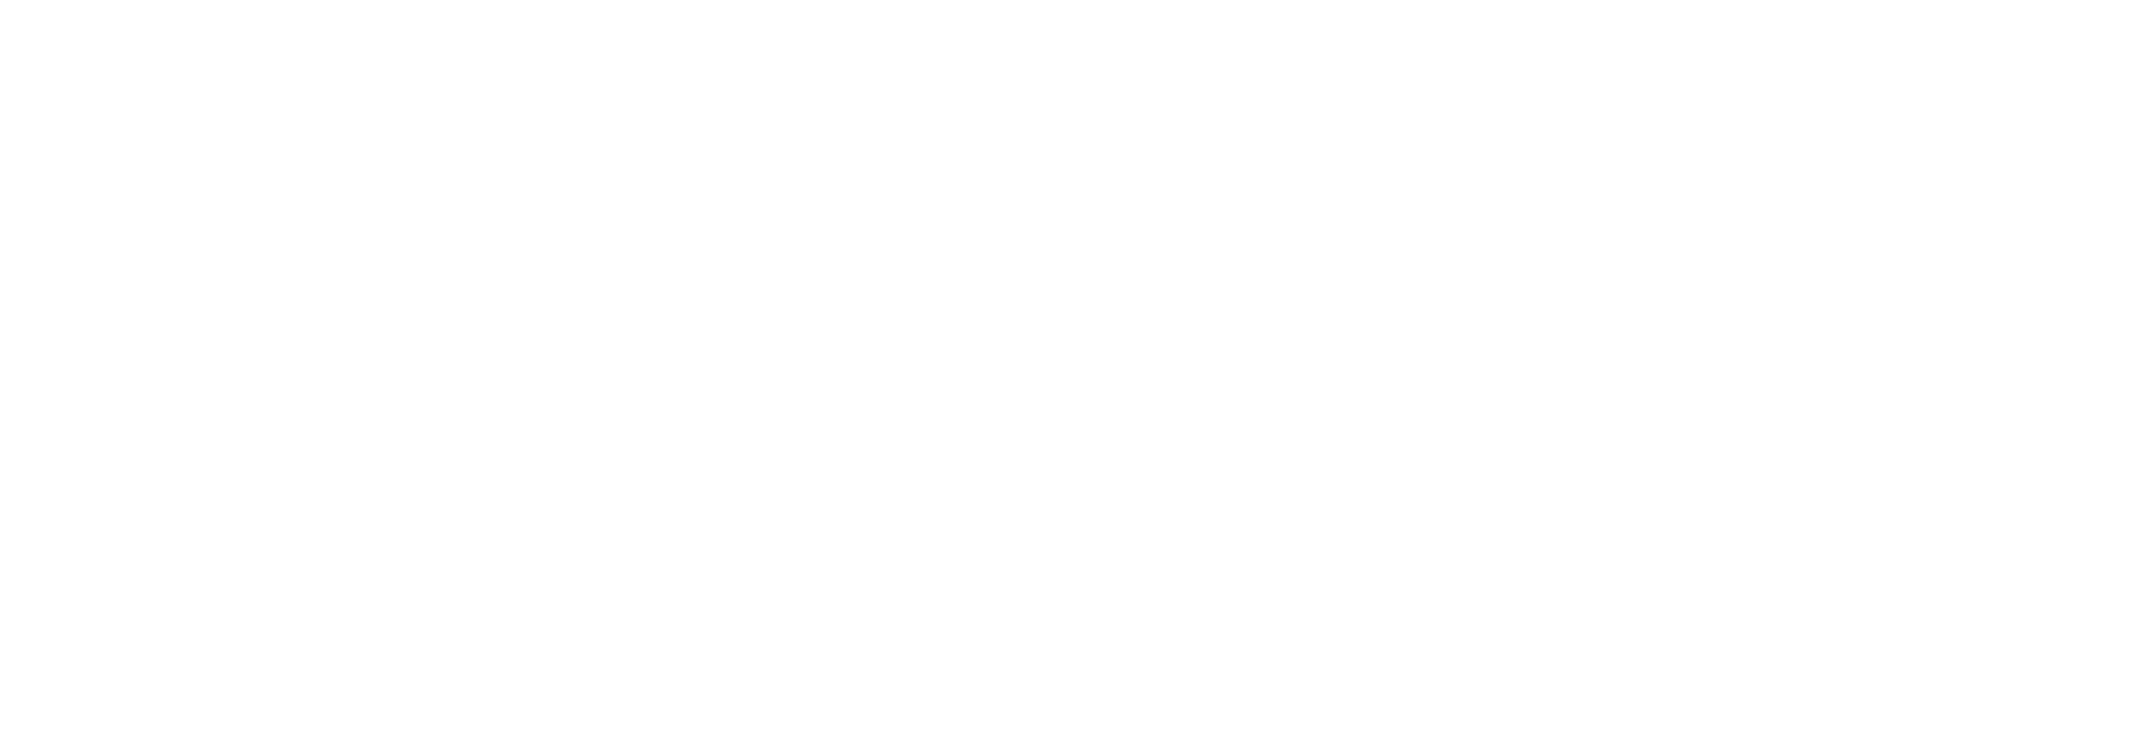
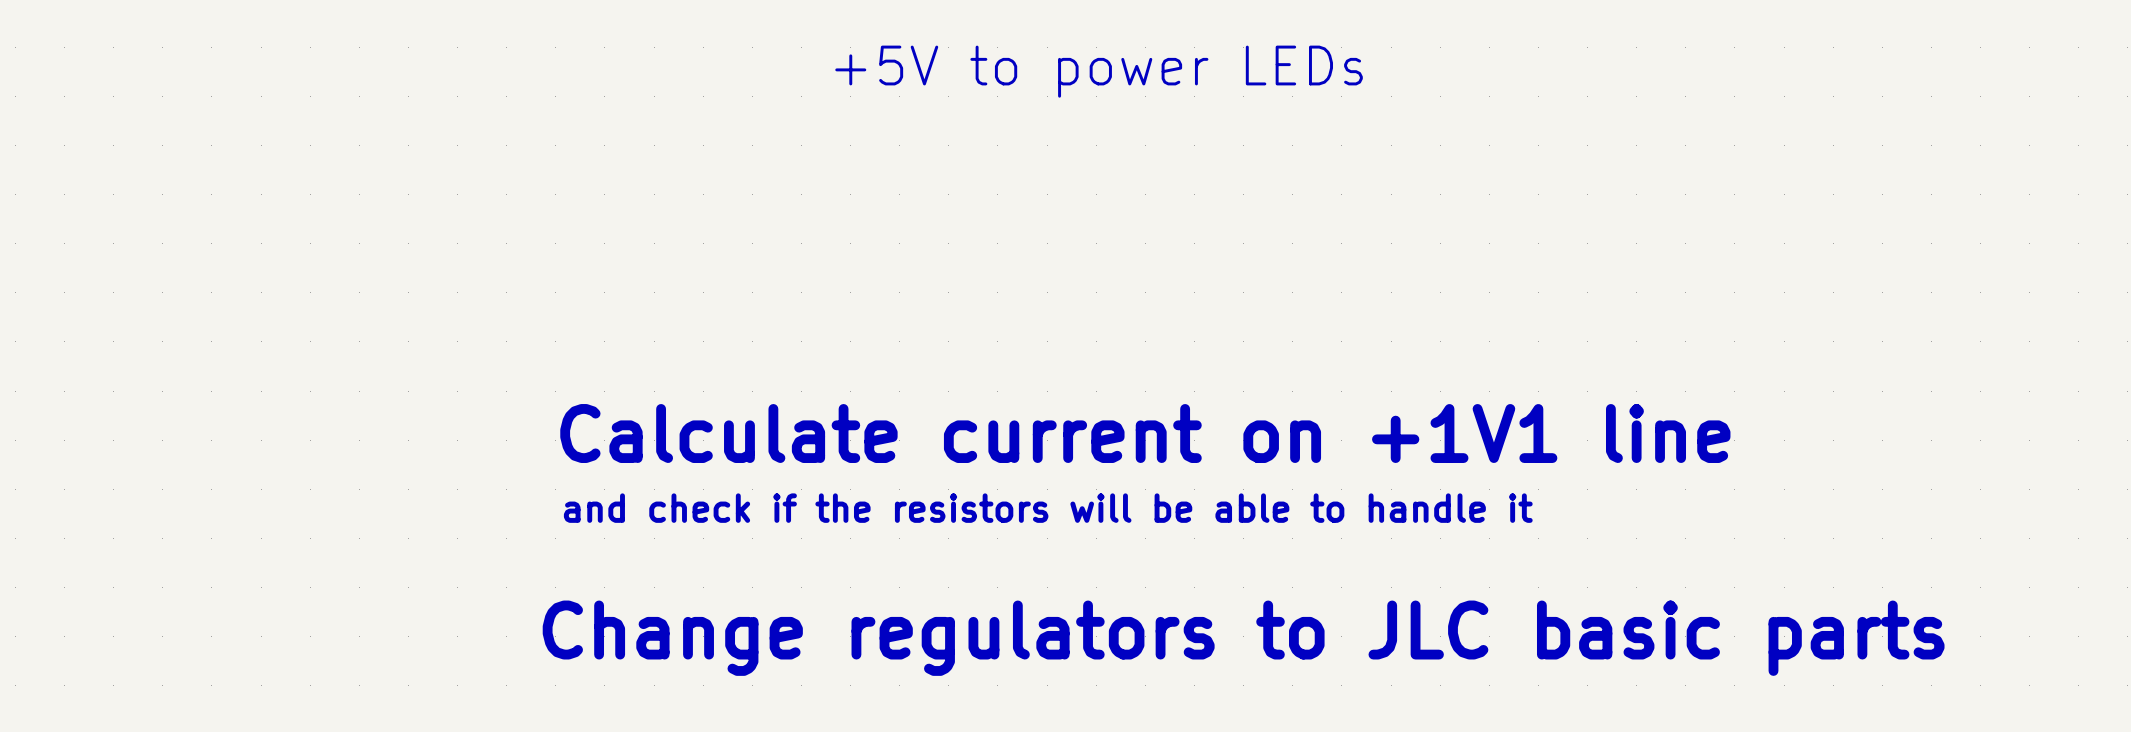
text: none -> +5V to power LEDs (1099, 71)
text: none -> Calculate current on +1V1 line (1145, 433)
text: none -> and check if the resistors will be able to handle it (1048, 508)
text: none -> Change regulators to JLC basic parts (1243, 638)

